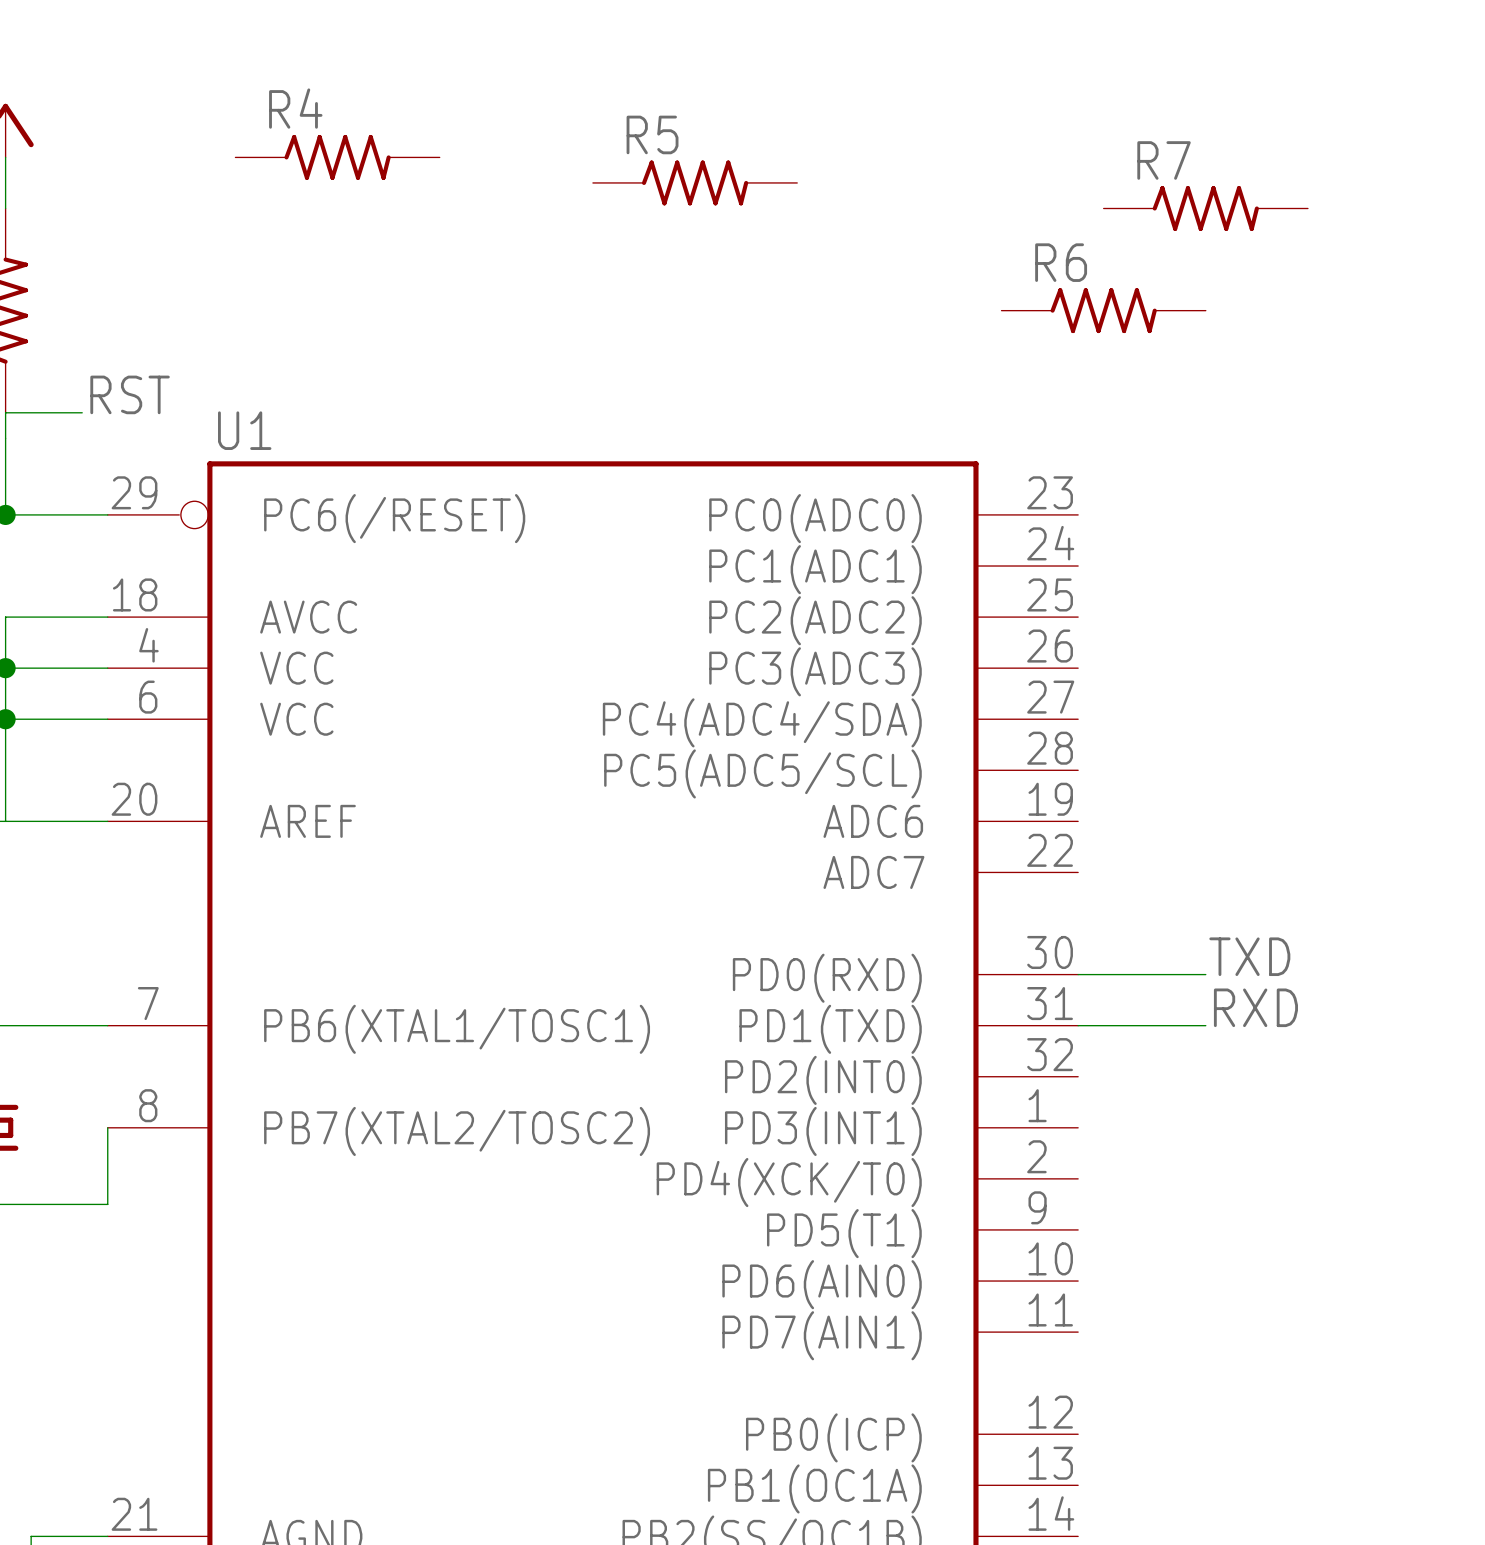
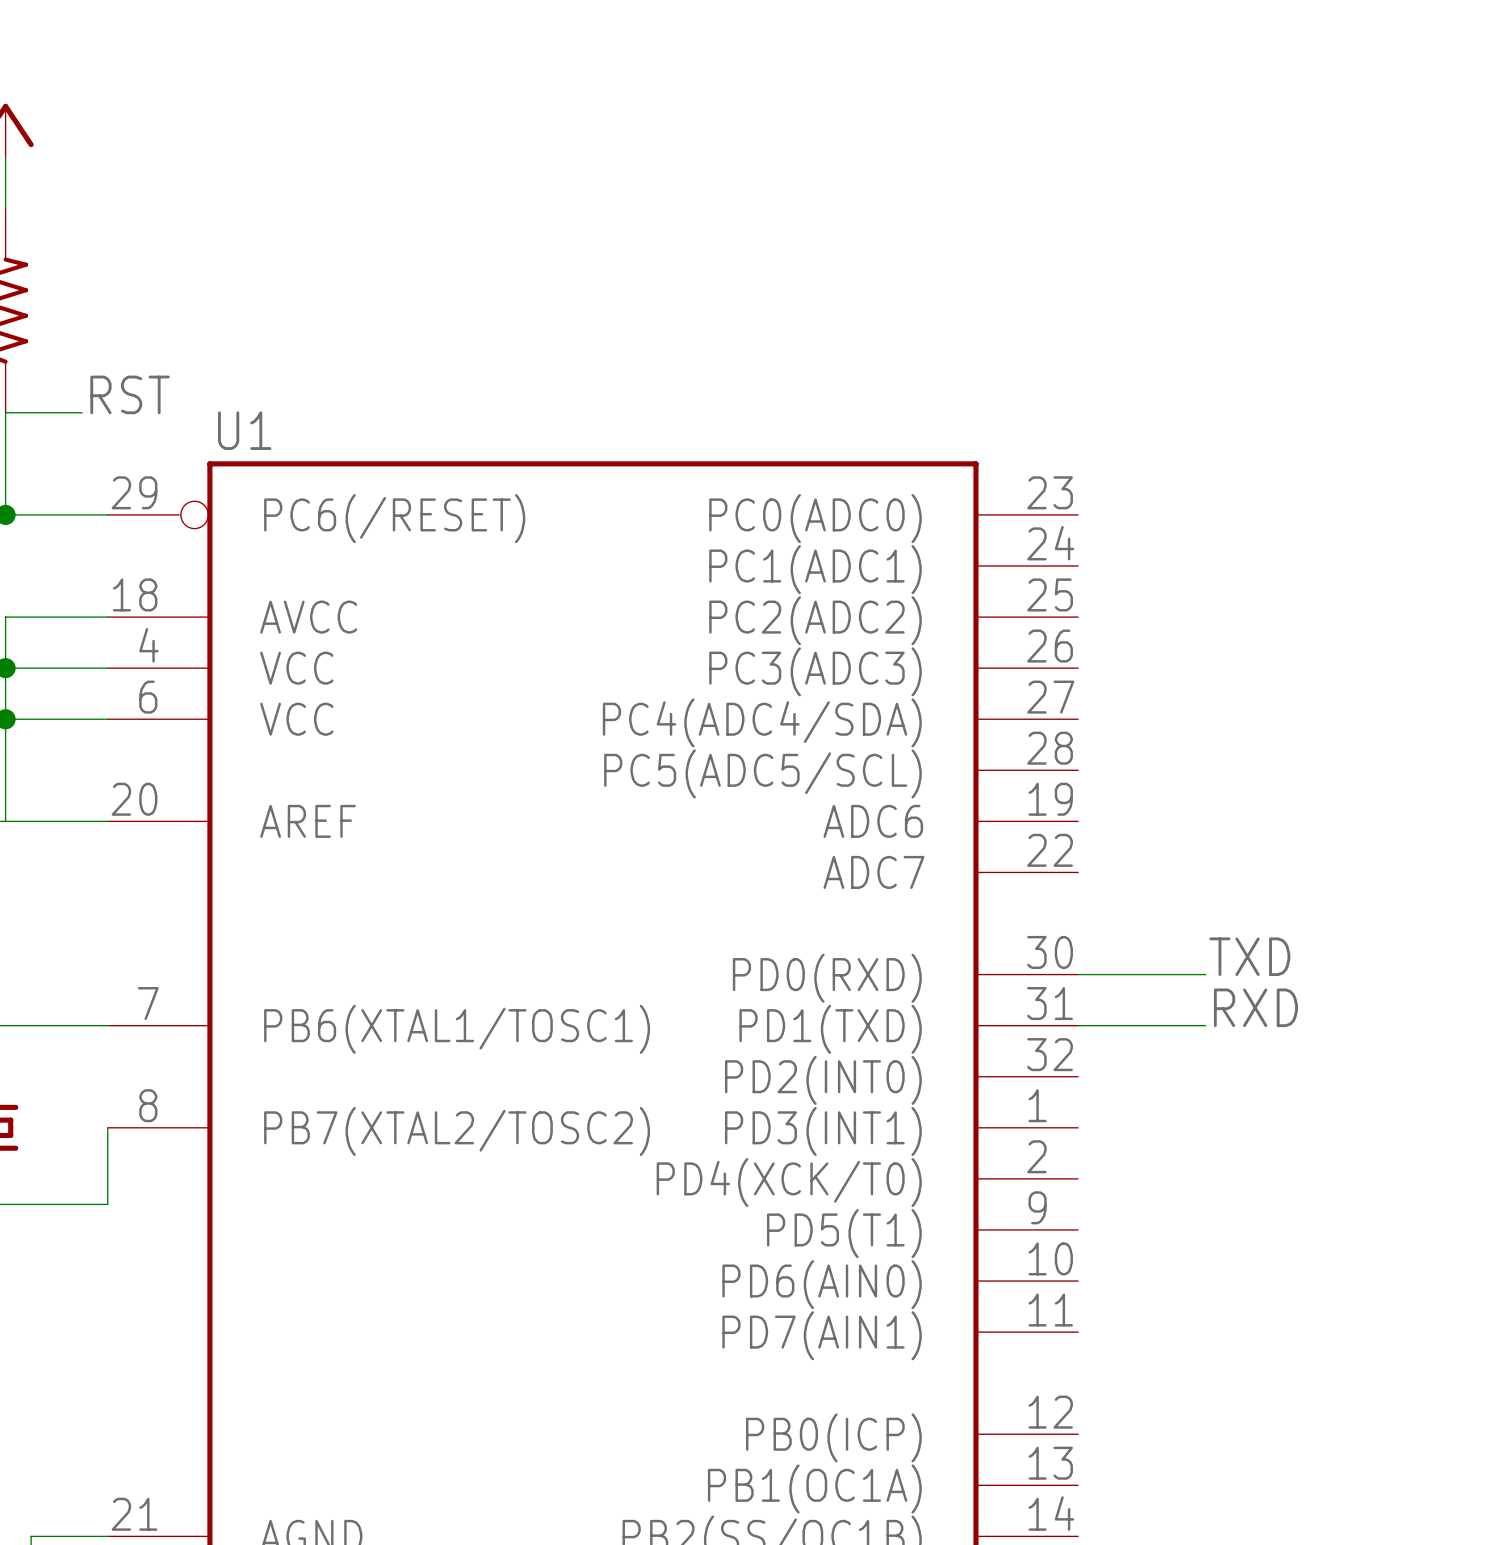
R4: (337, 157) -> none
R5: (695, 182) -> none
R7: (1205, 208) -> none
R6: (1103, 310) -> none

